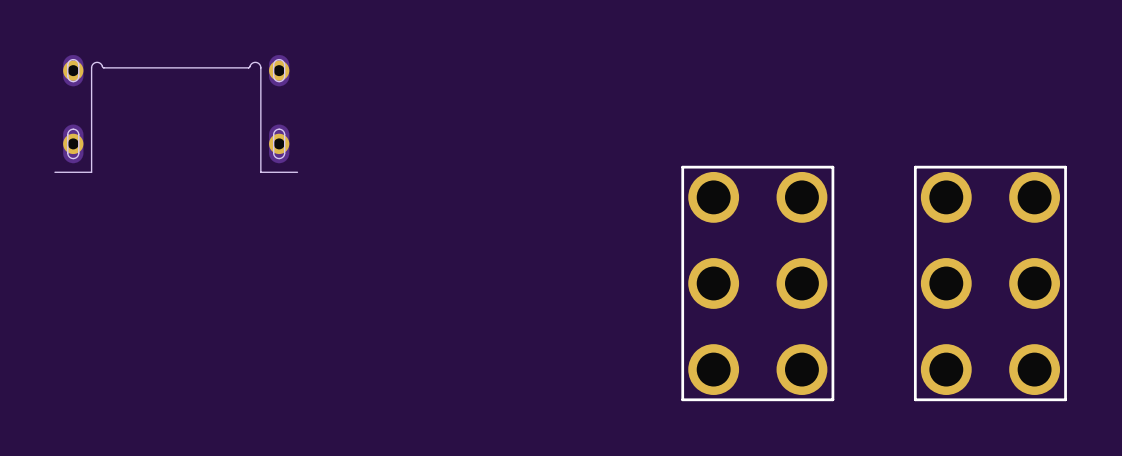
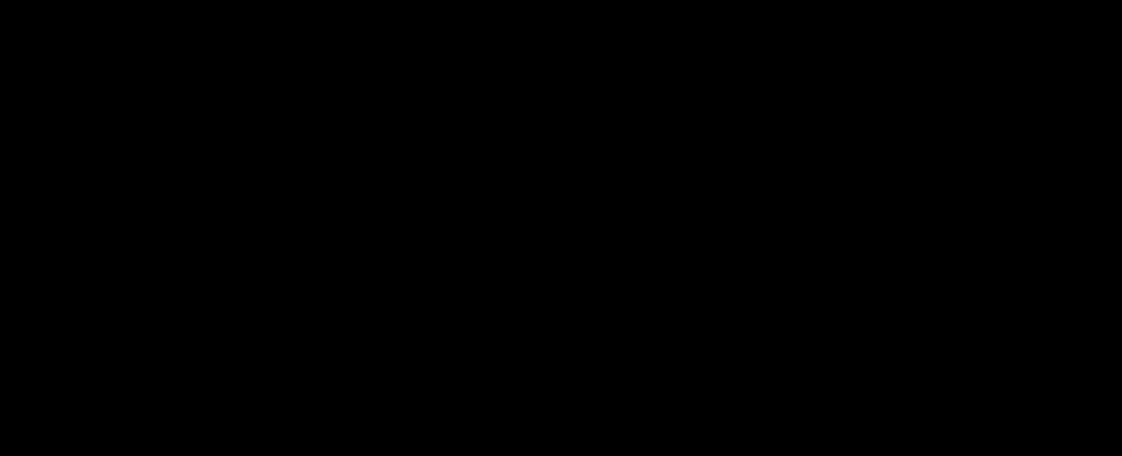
part: (176, 113) -> none
part: (757, 283) -> none
part: (990, 283) -> none

